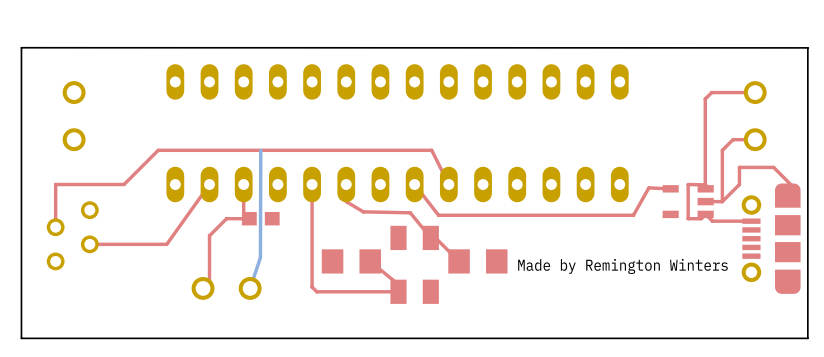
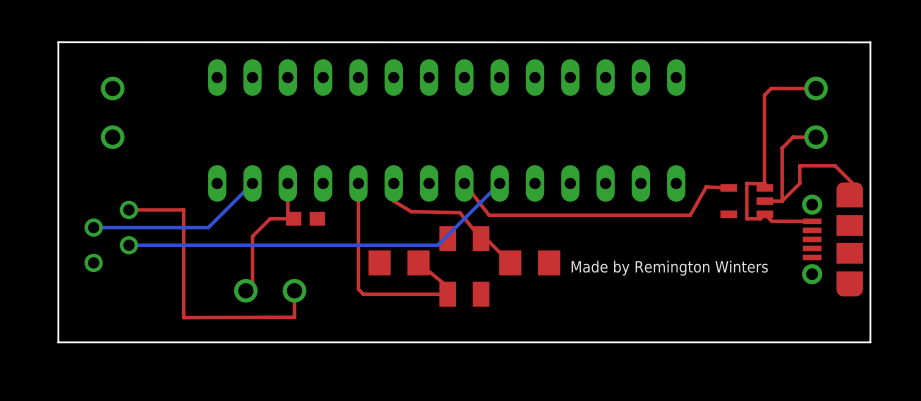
bottom track: (260, 150) (260, 257) (250, 288) -> none
top track: (209, 184) (166, 244) (89, 244) -> none
bottom track: none -> (252, 183) (208, 227) (93, 227)
top track: (448, 184) (431, 150) (158, 150) (124, 184) (55, 184) (55, 227) -> none
bottom track: none -> (499, 183) (437, 245) (128, 245)
top track: none -> (128, 209) (183, 209) (183, 317) (294, 317) (294, 290)

